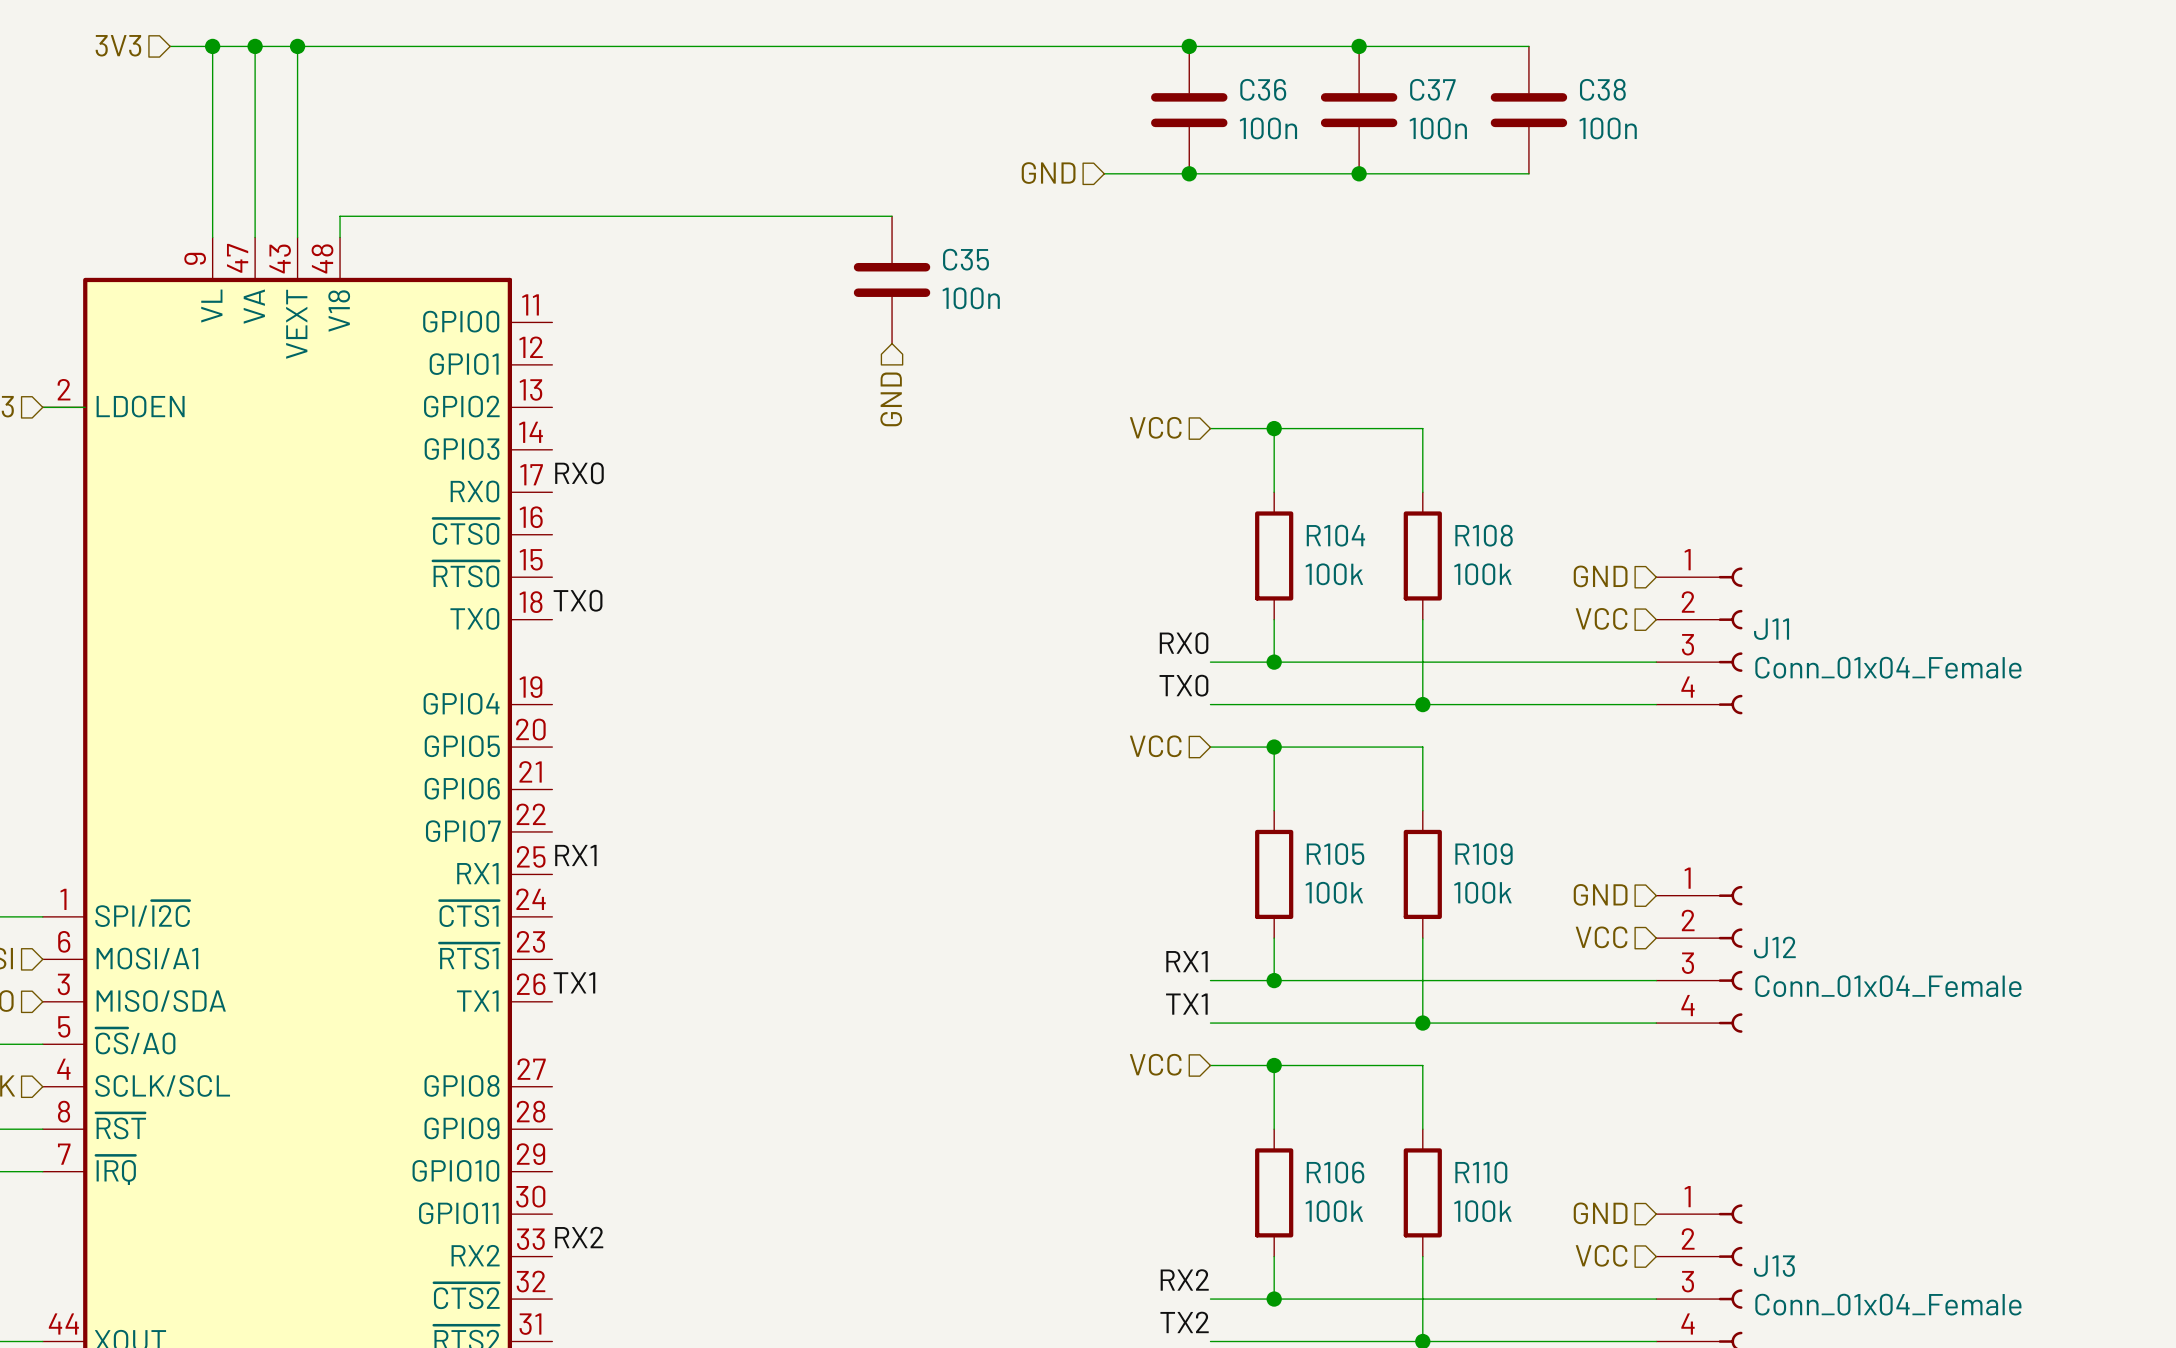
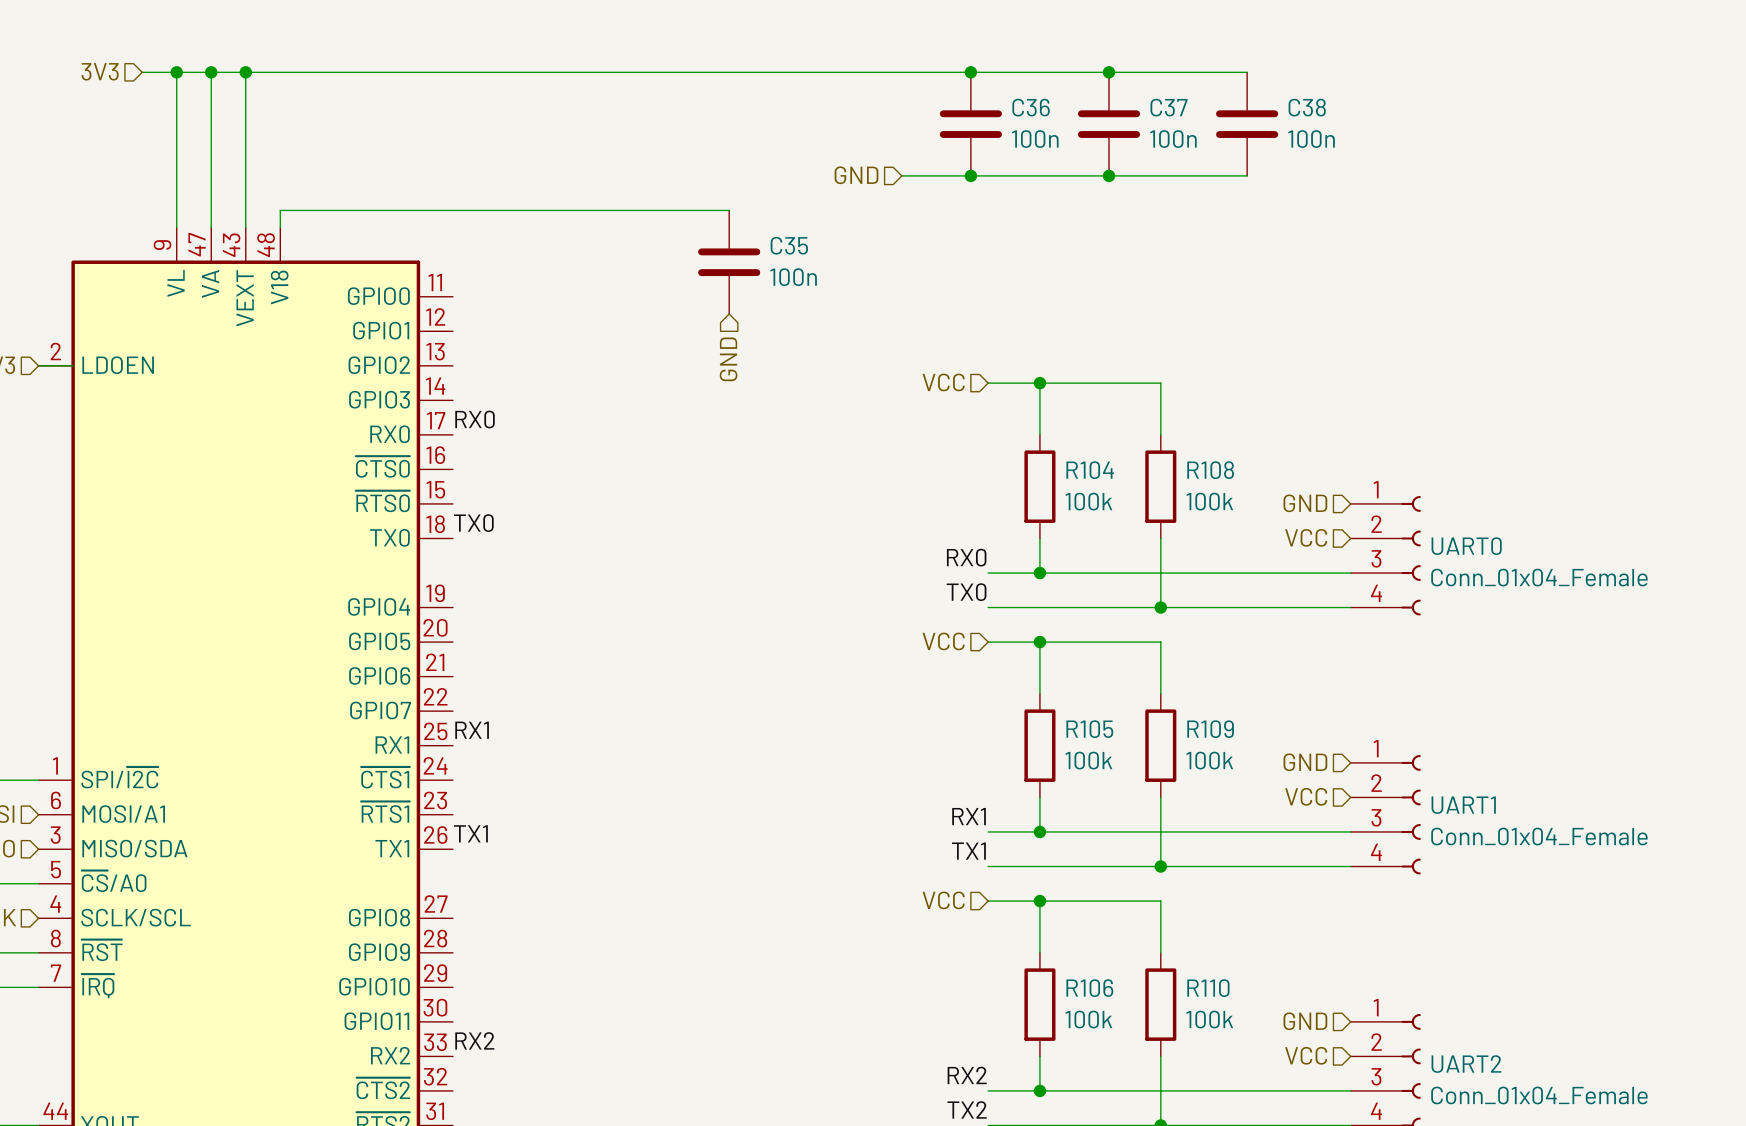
J11 name: J11 (1771, 629) -> UART0 (1466, 546)
J12 name: J12 (1774, 947) -> UART1 (1463, 805)
J13 name: J13 (1774, 1266) -> UART2 (1466, 1064)

